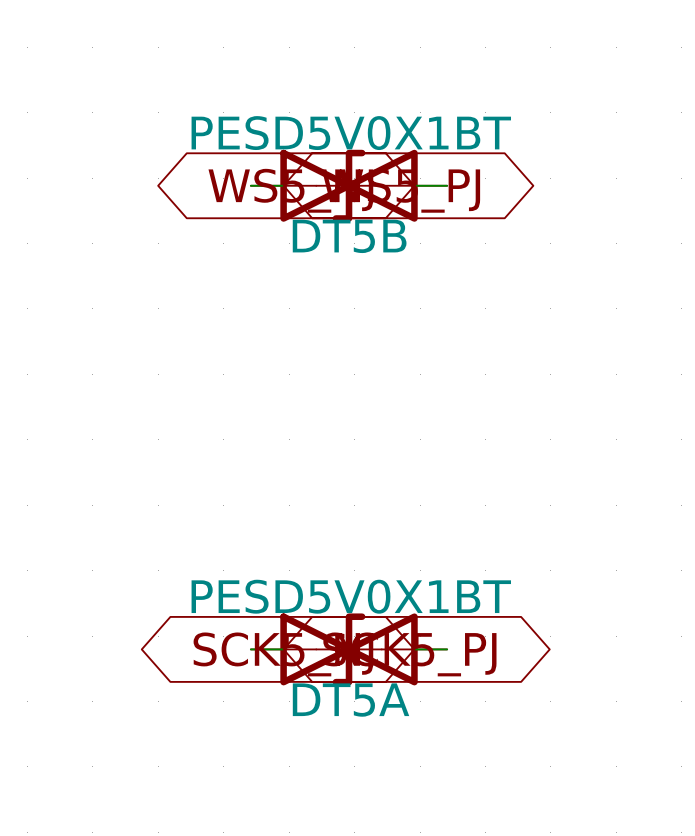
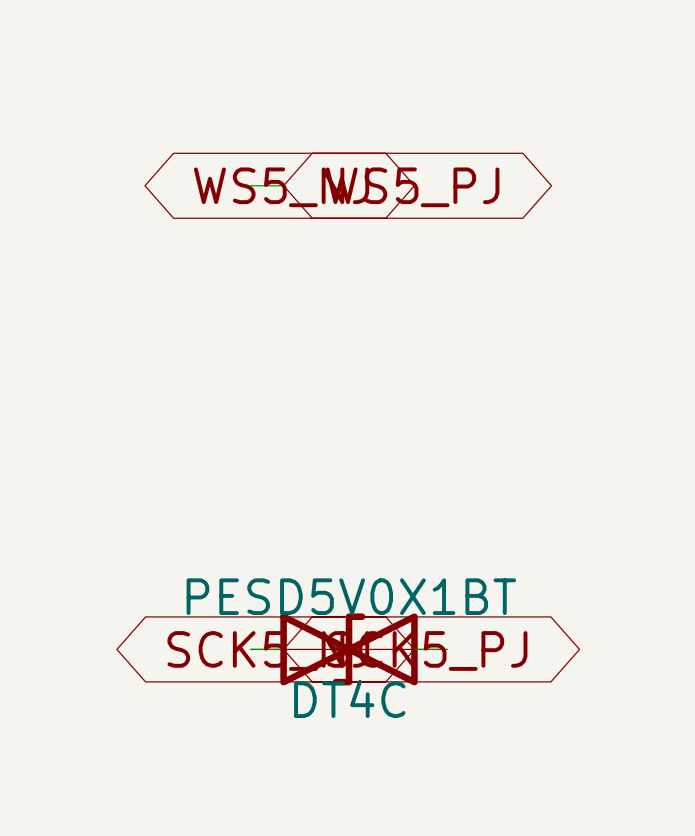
DT5B: PESD5V0X1BT (349, 185) -> none
wire: (414, 185) (447, 185) -> none
DT5A name: DT5A (351, 700) -> DT4C (349, 698)

